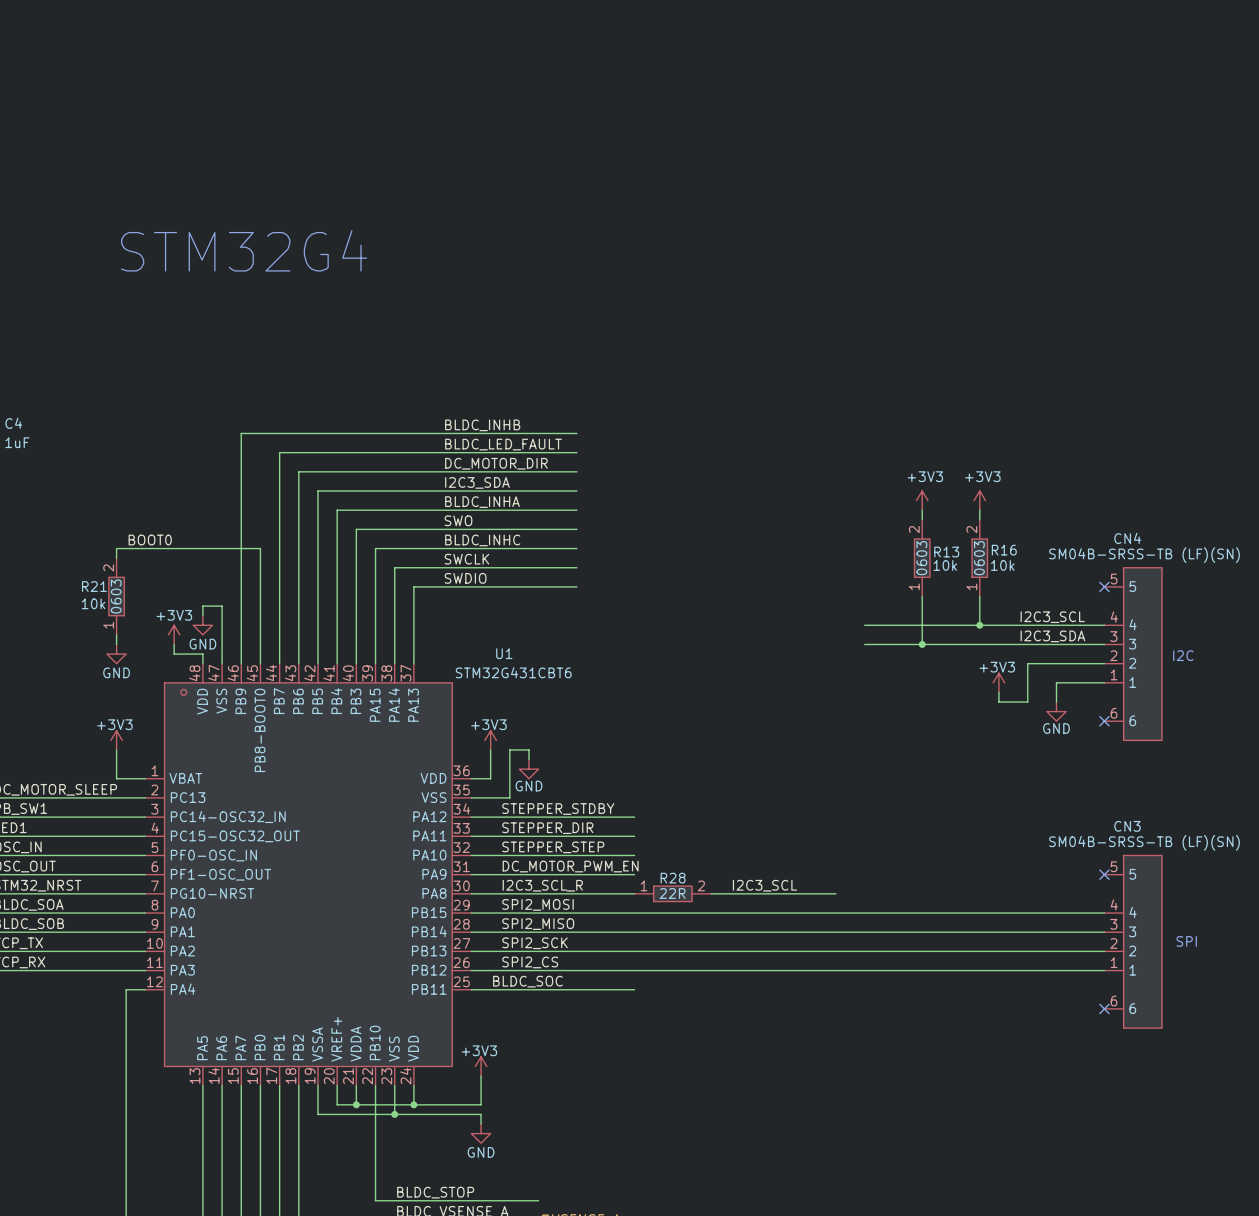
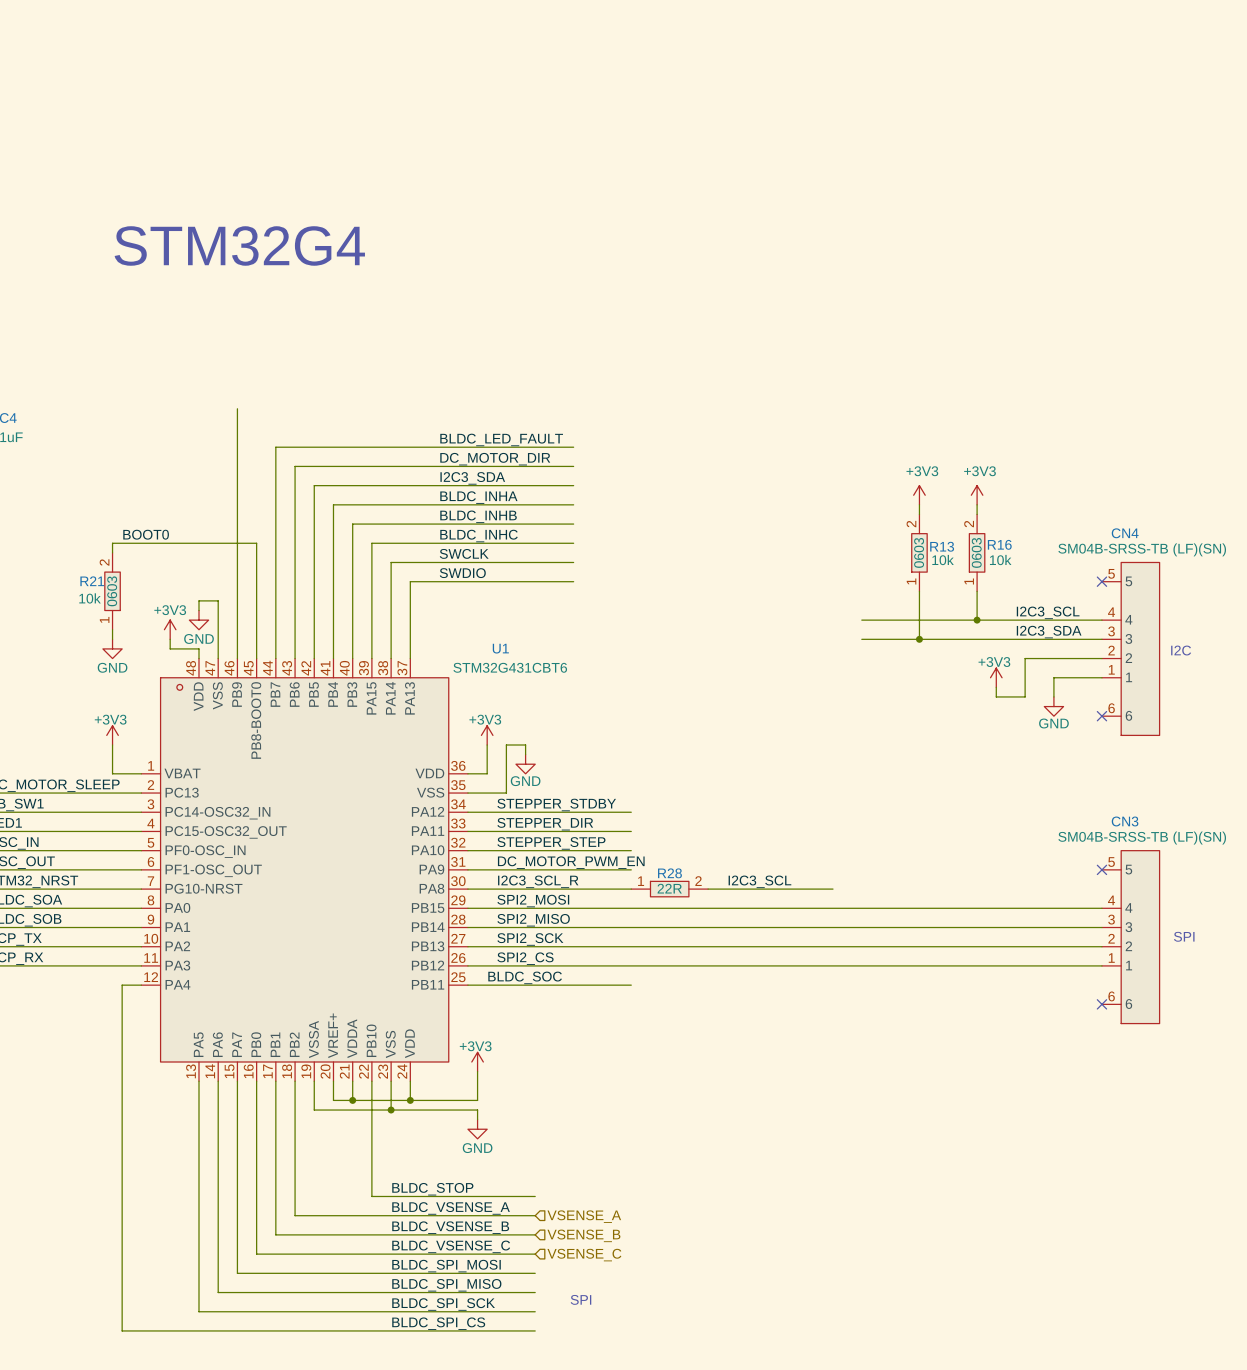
label: BLDC_INHB (482, 425) -> none
wire: (241, 433) (576, 433) -> (237, 428) (237, 408)
label: SWO (458, 520) -> BLDC_INHB (478, 516)

